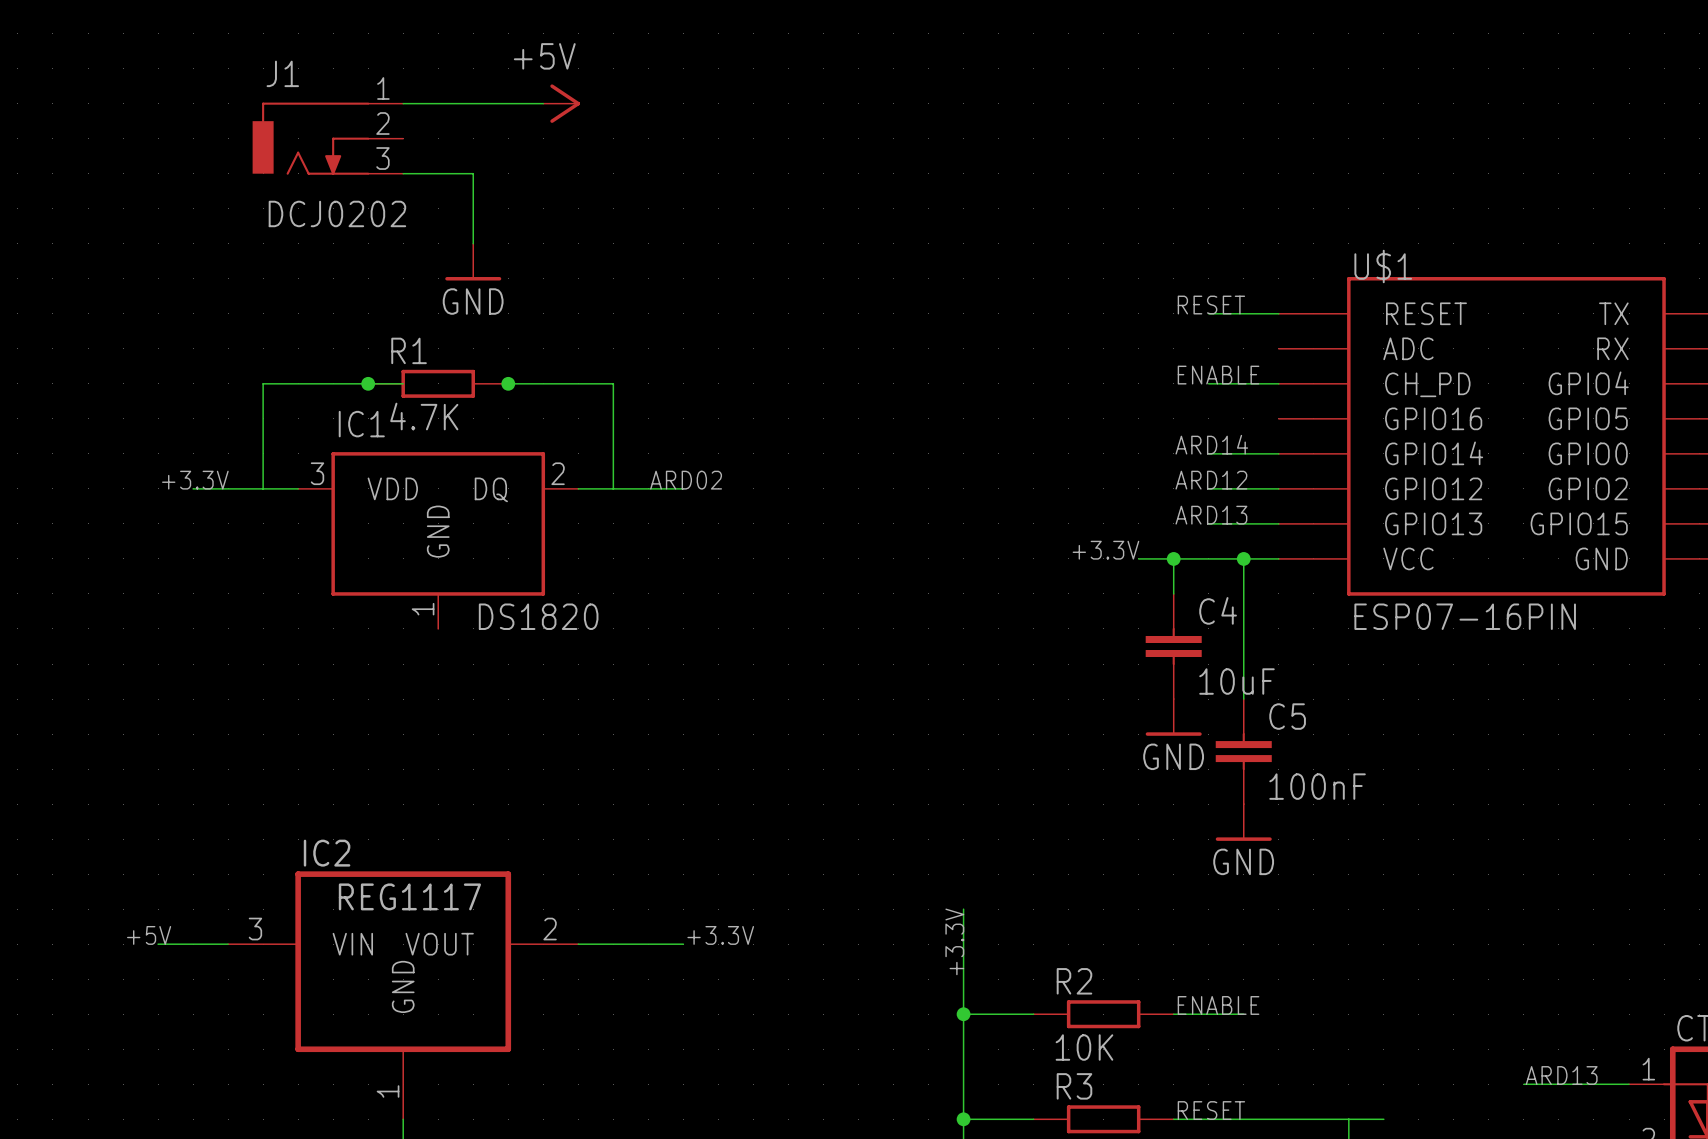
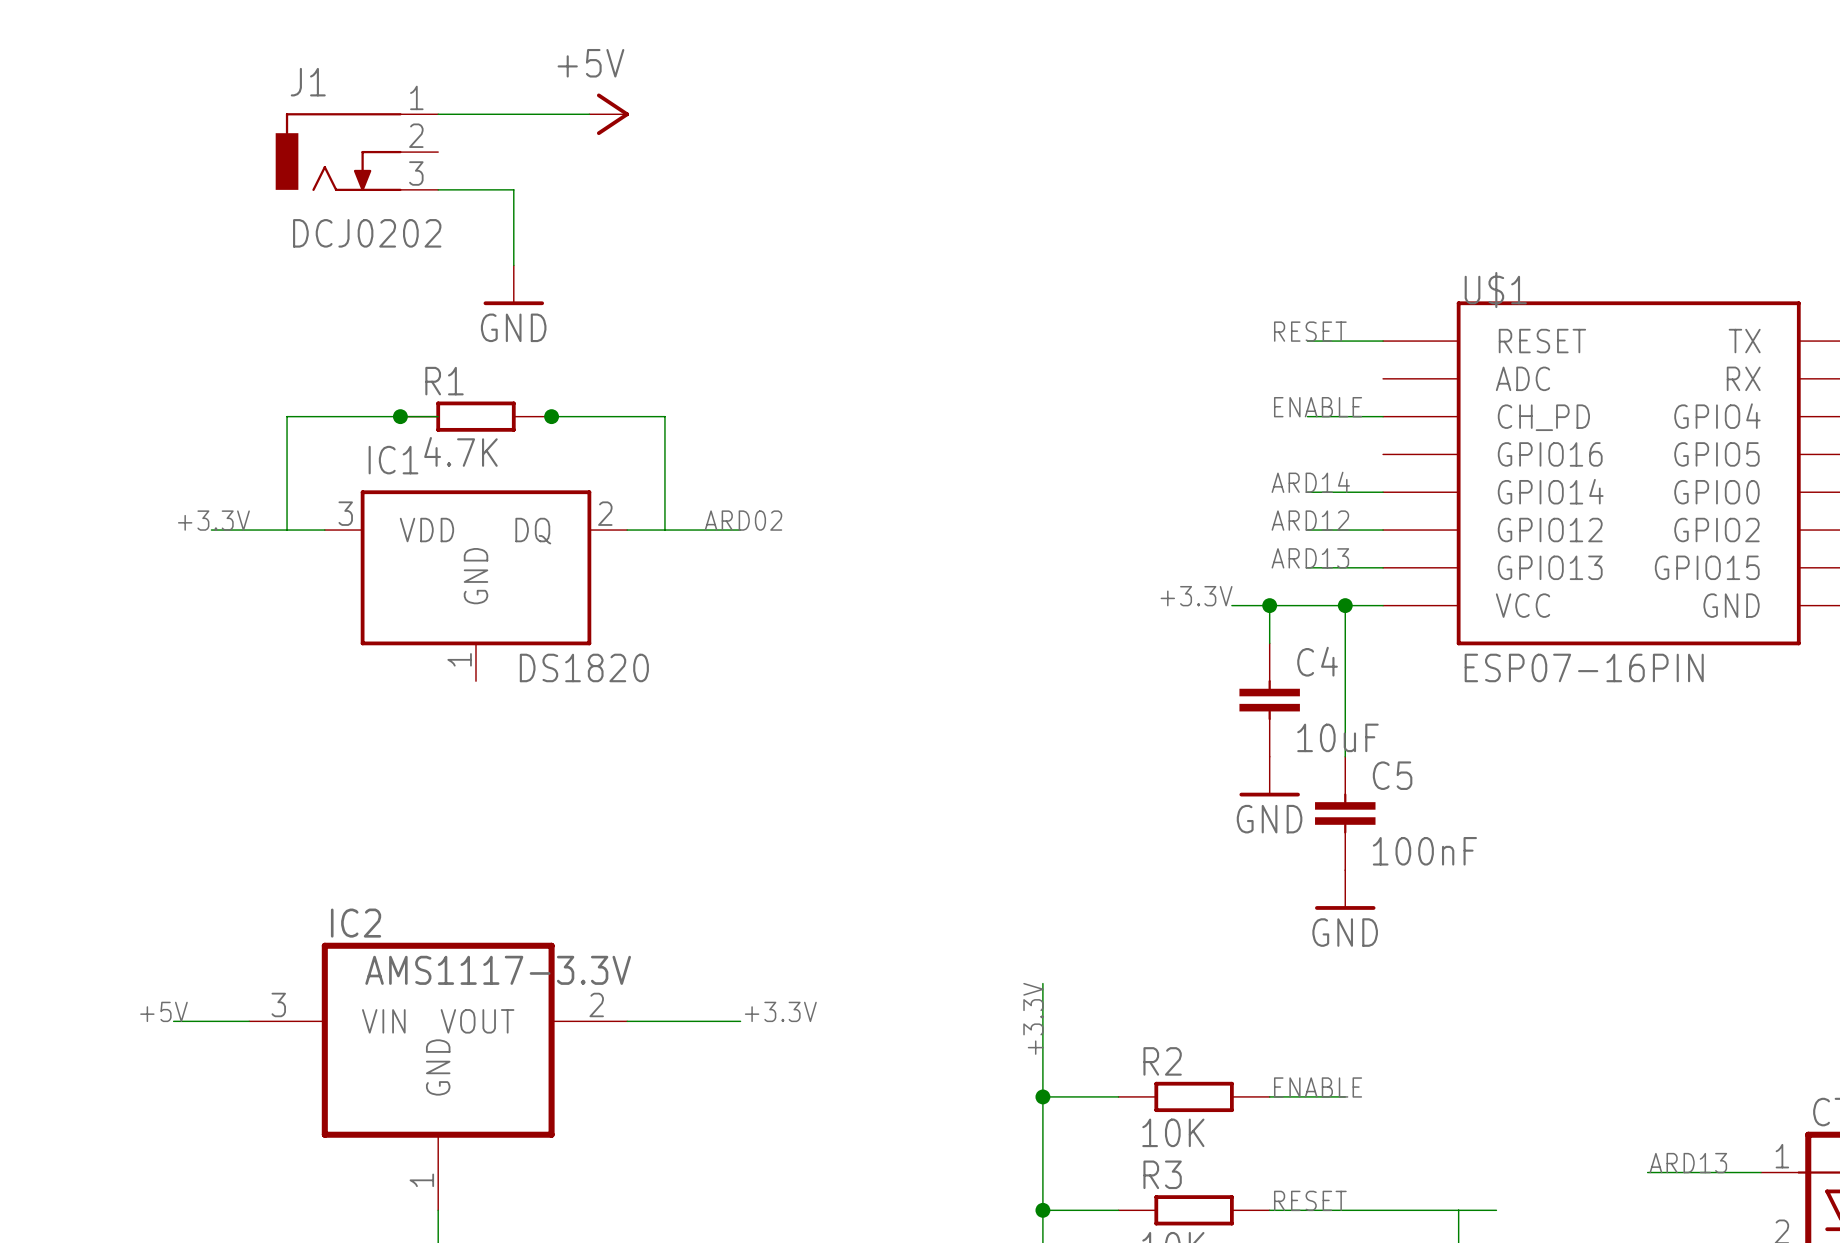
IC2 value: REG1117 (409, 896) -> AMS1117-3.3V (498, 970)

